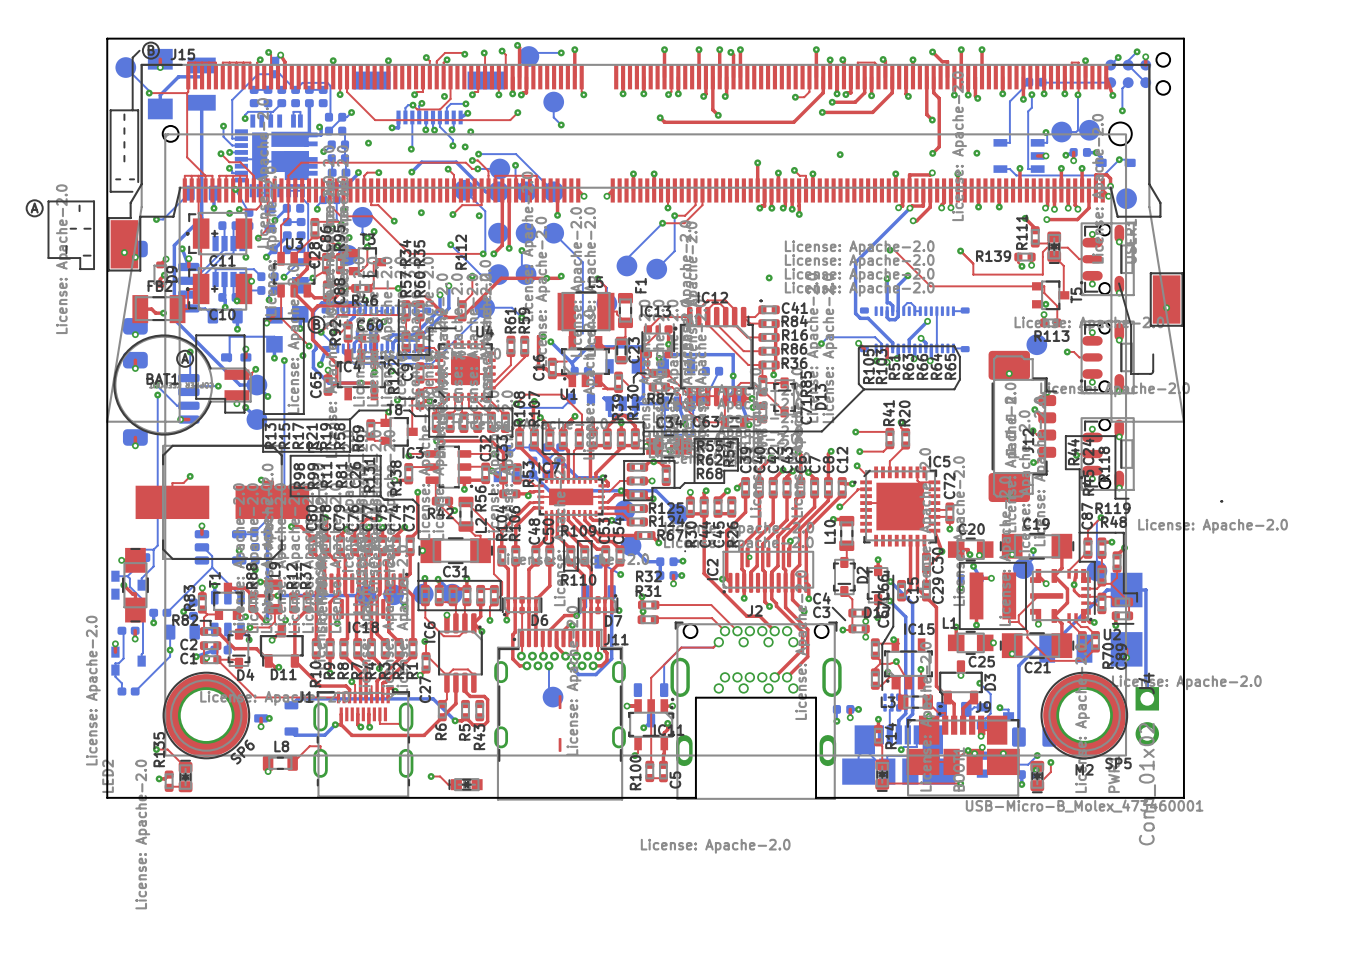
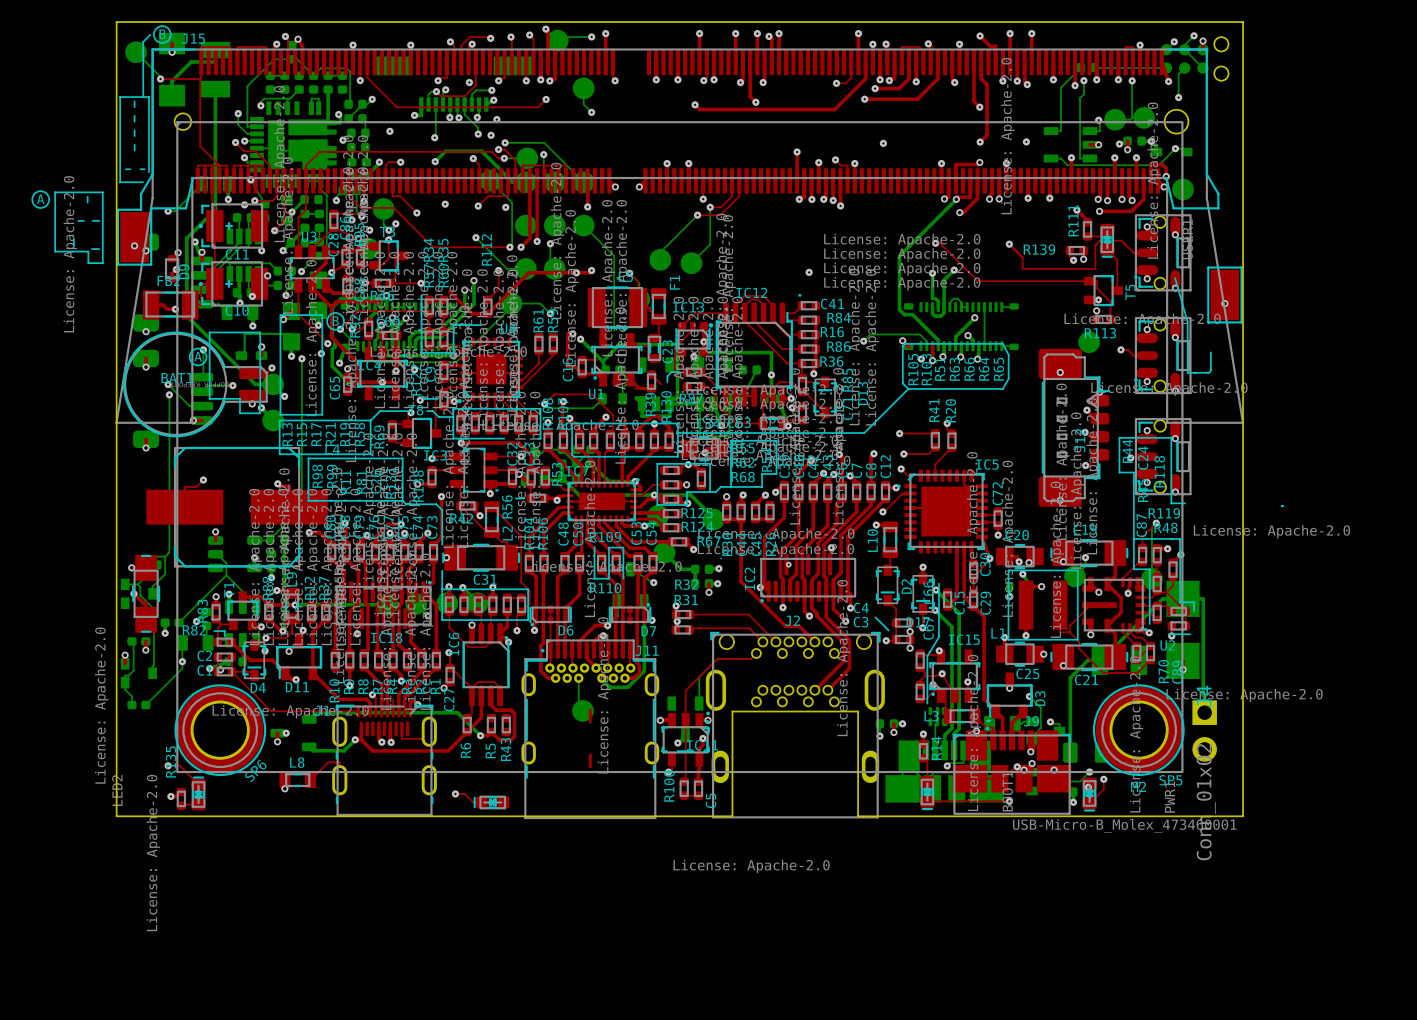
top track: (1074, 584) (1074, 590) (1079, 595) (1086, 595) -> none

